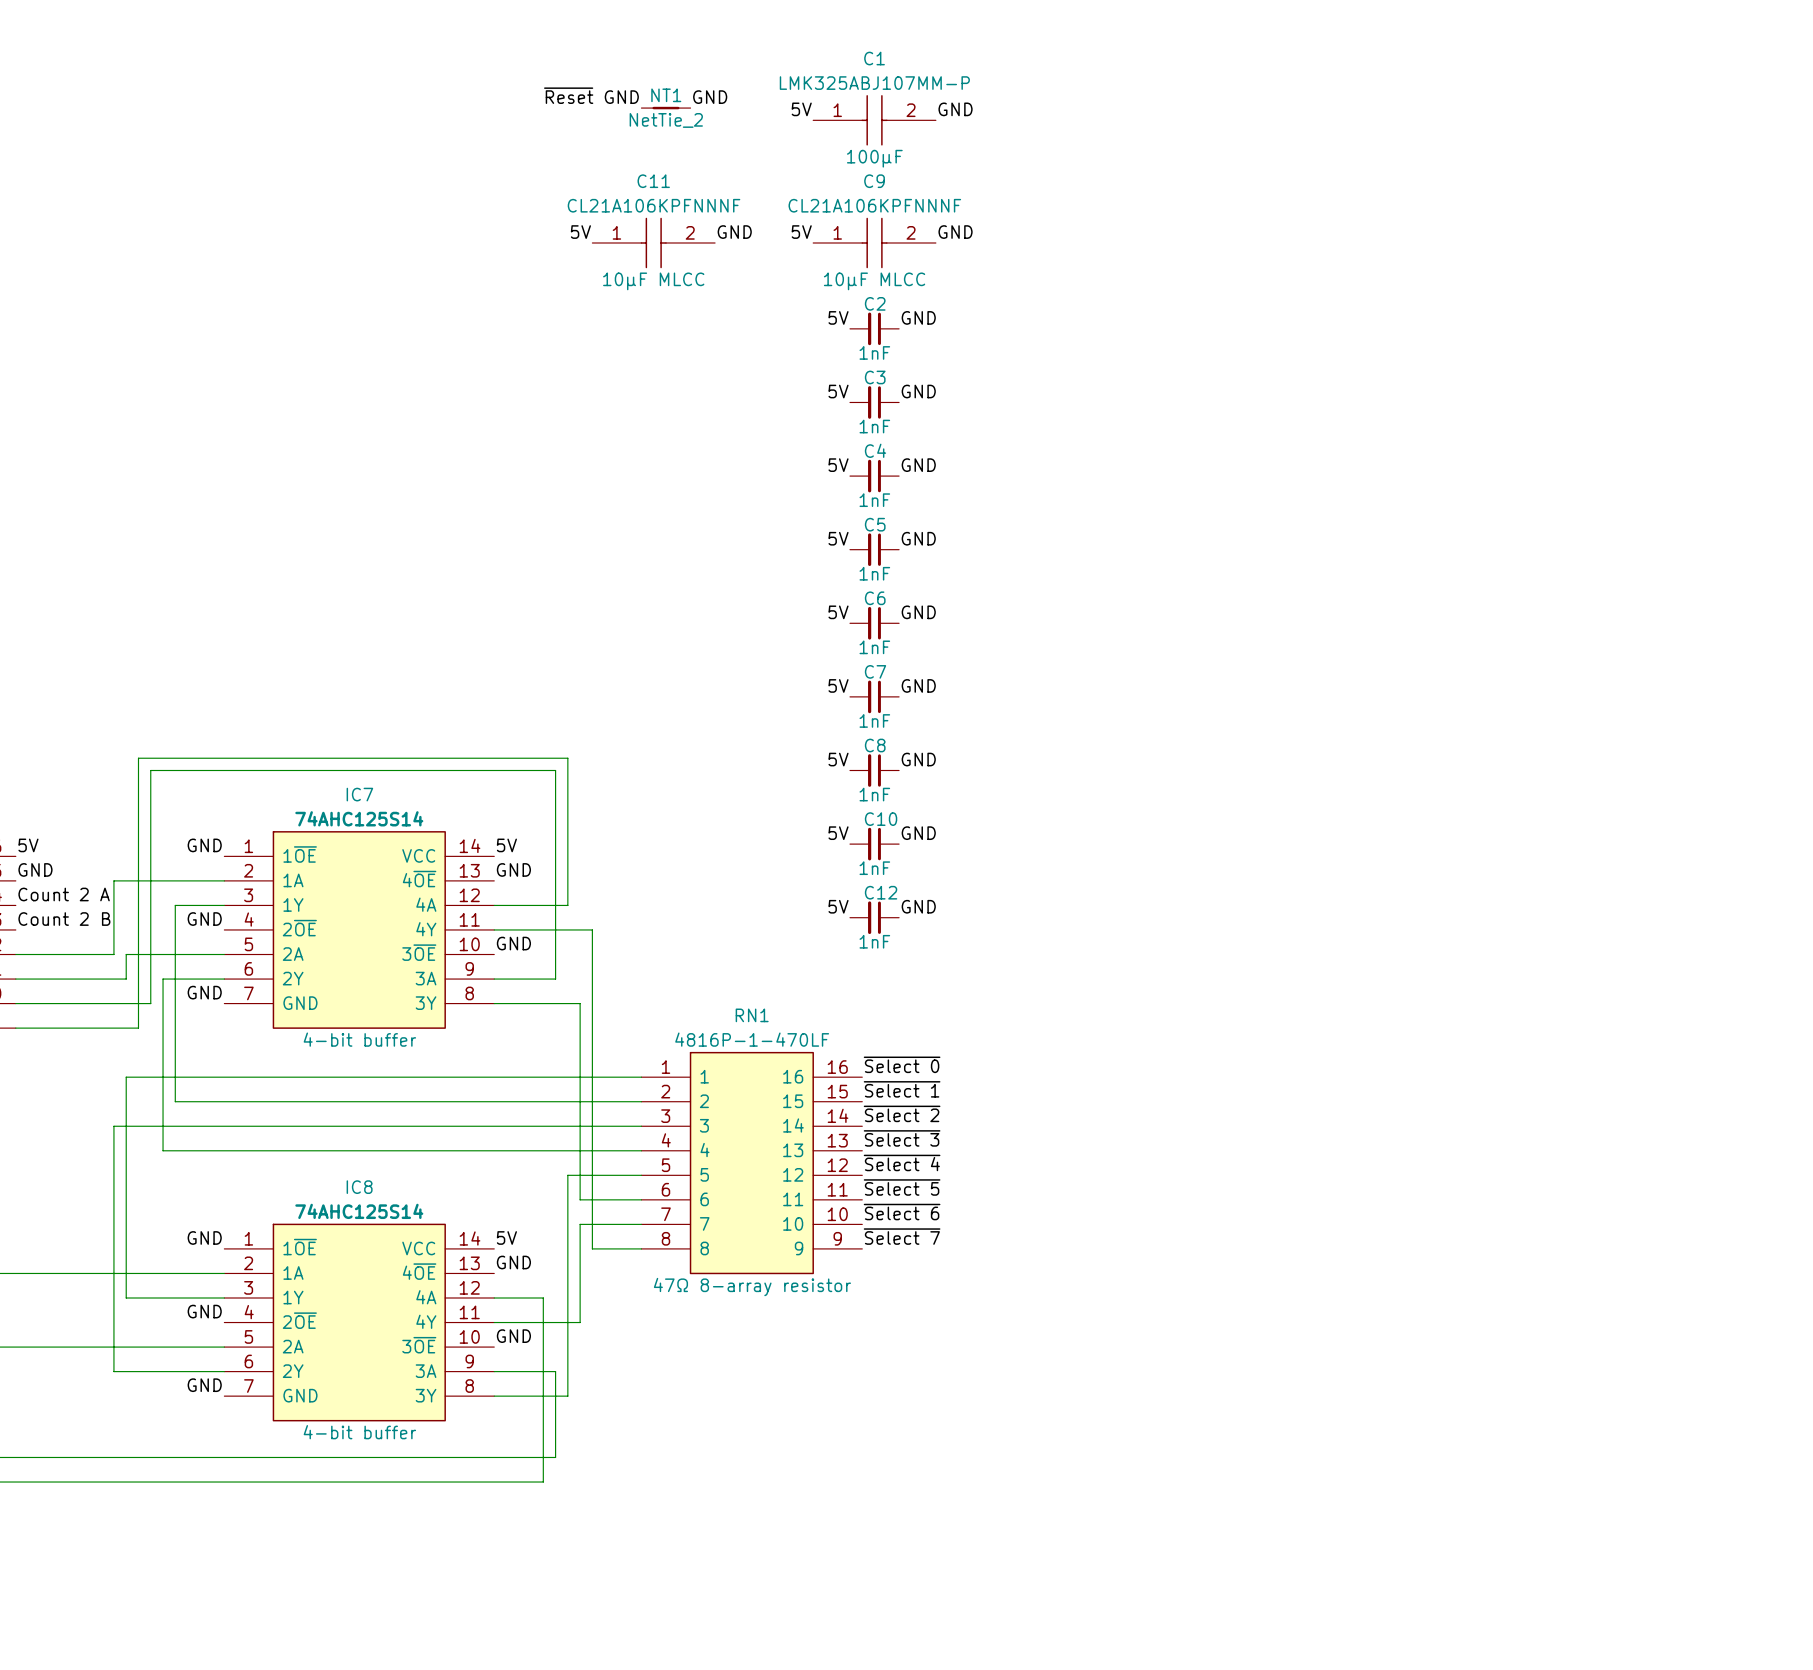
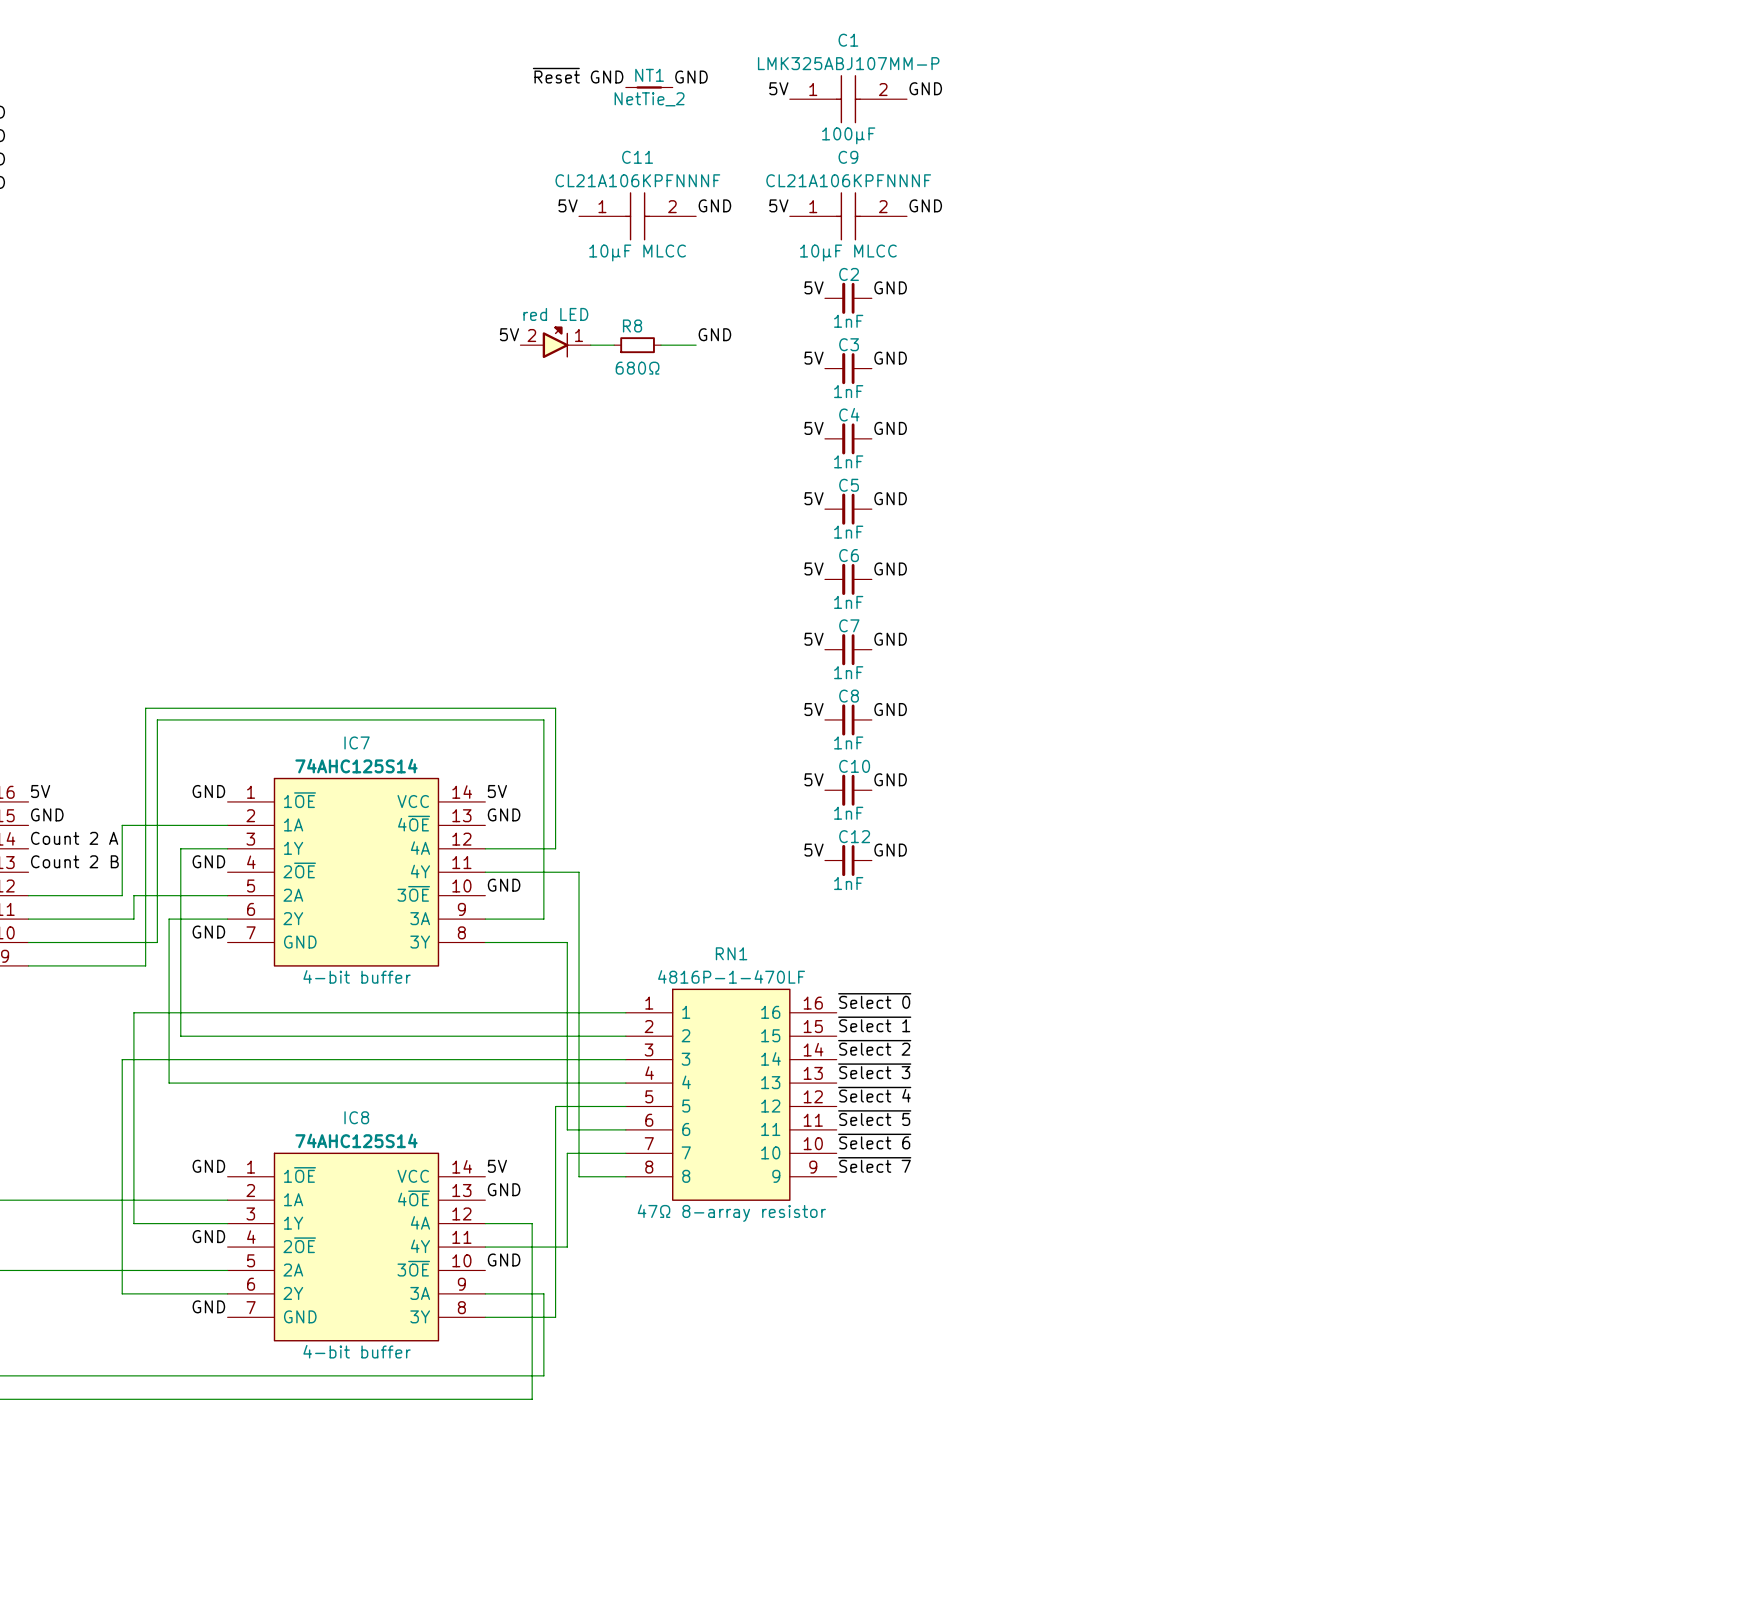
label: none -> 5V (509, 334)
label: none -> GND (714, 334)
part: none -> (555, 342)
wire: none -> (590, 345) (614, 345)
R8: none -> (637, 345)
wire: none -> (661, 345) (696, 345)

